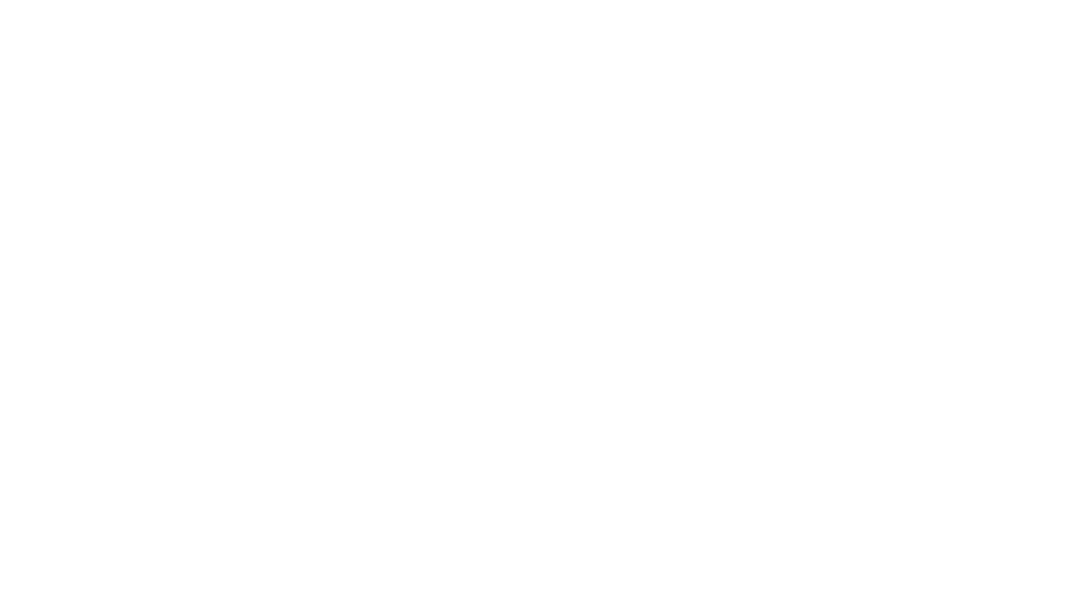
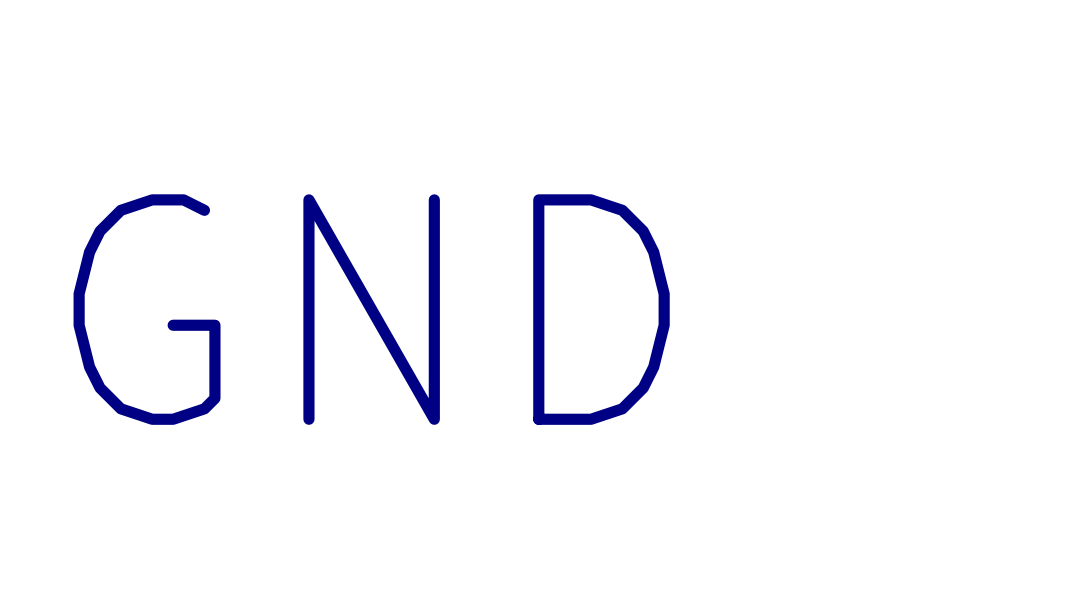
text: none -> GND (371, 309)

